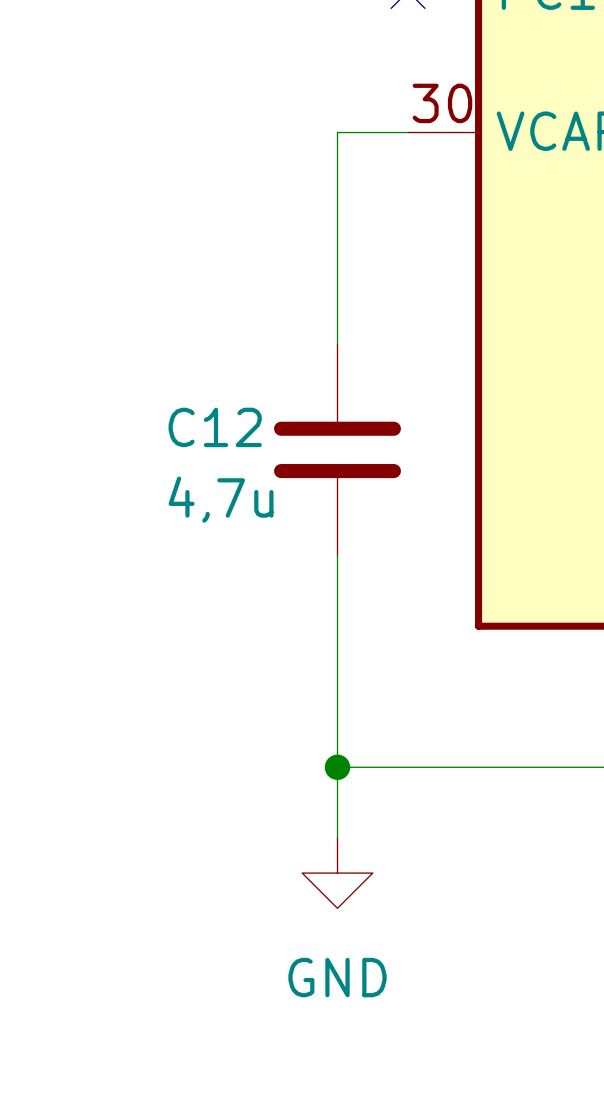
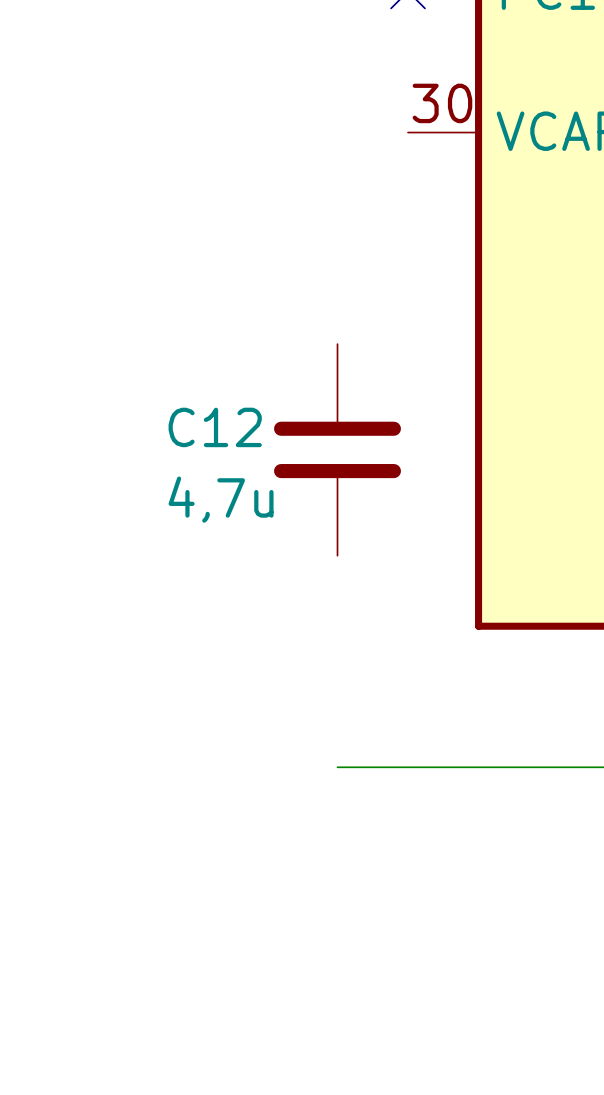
wire: (408, 132) (337, 132) (337, 344) -> none
wire: (337, 555) (337, 837) -> none
junction: (337, 767) -> none
power symbol: GND (337, 873) -> none

